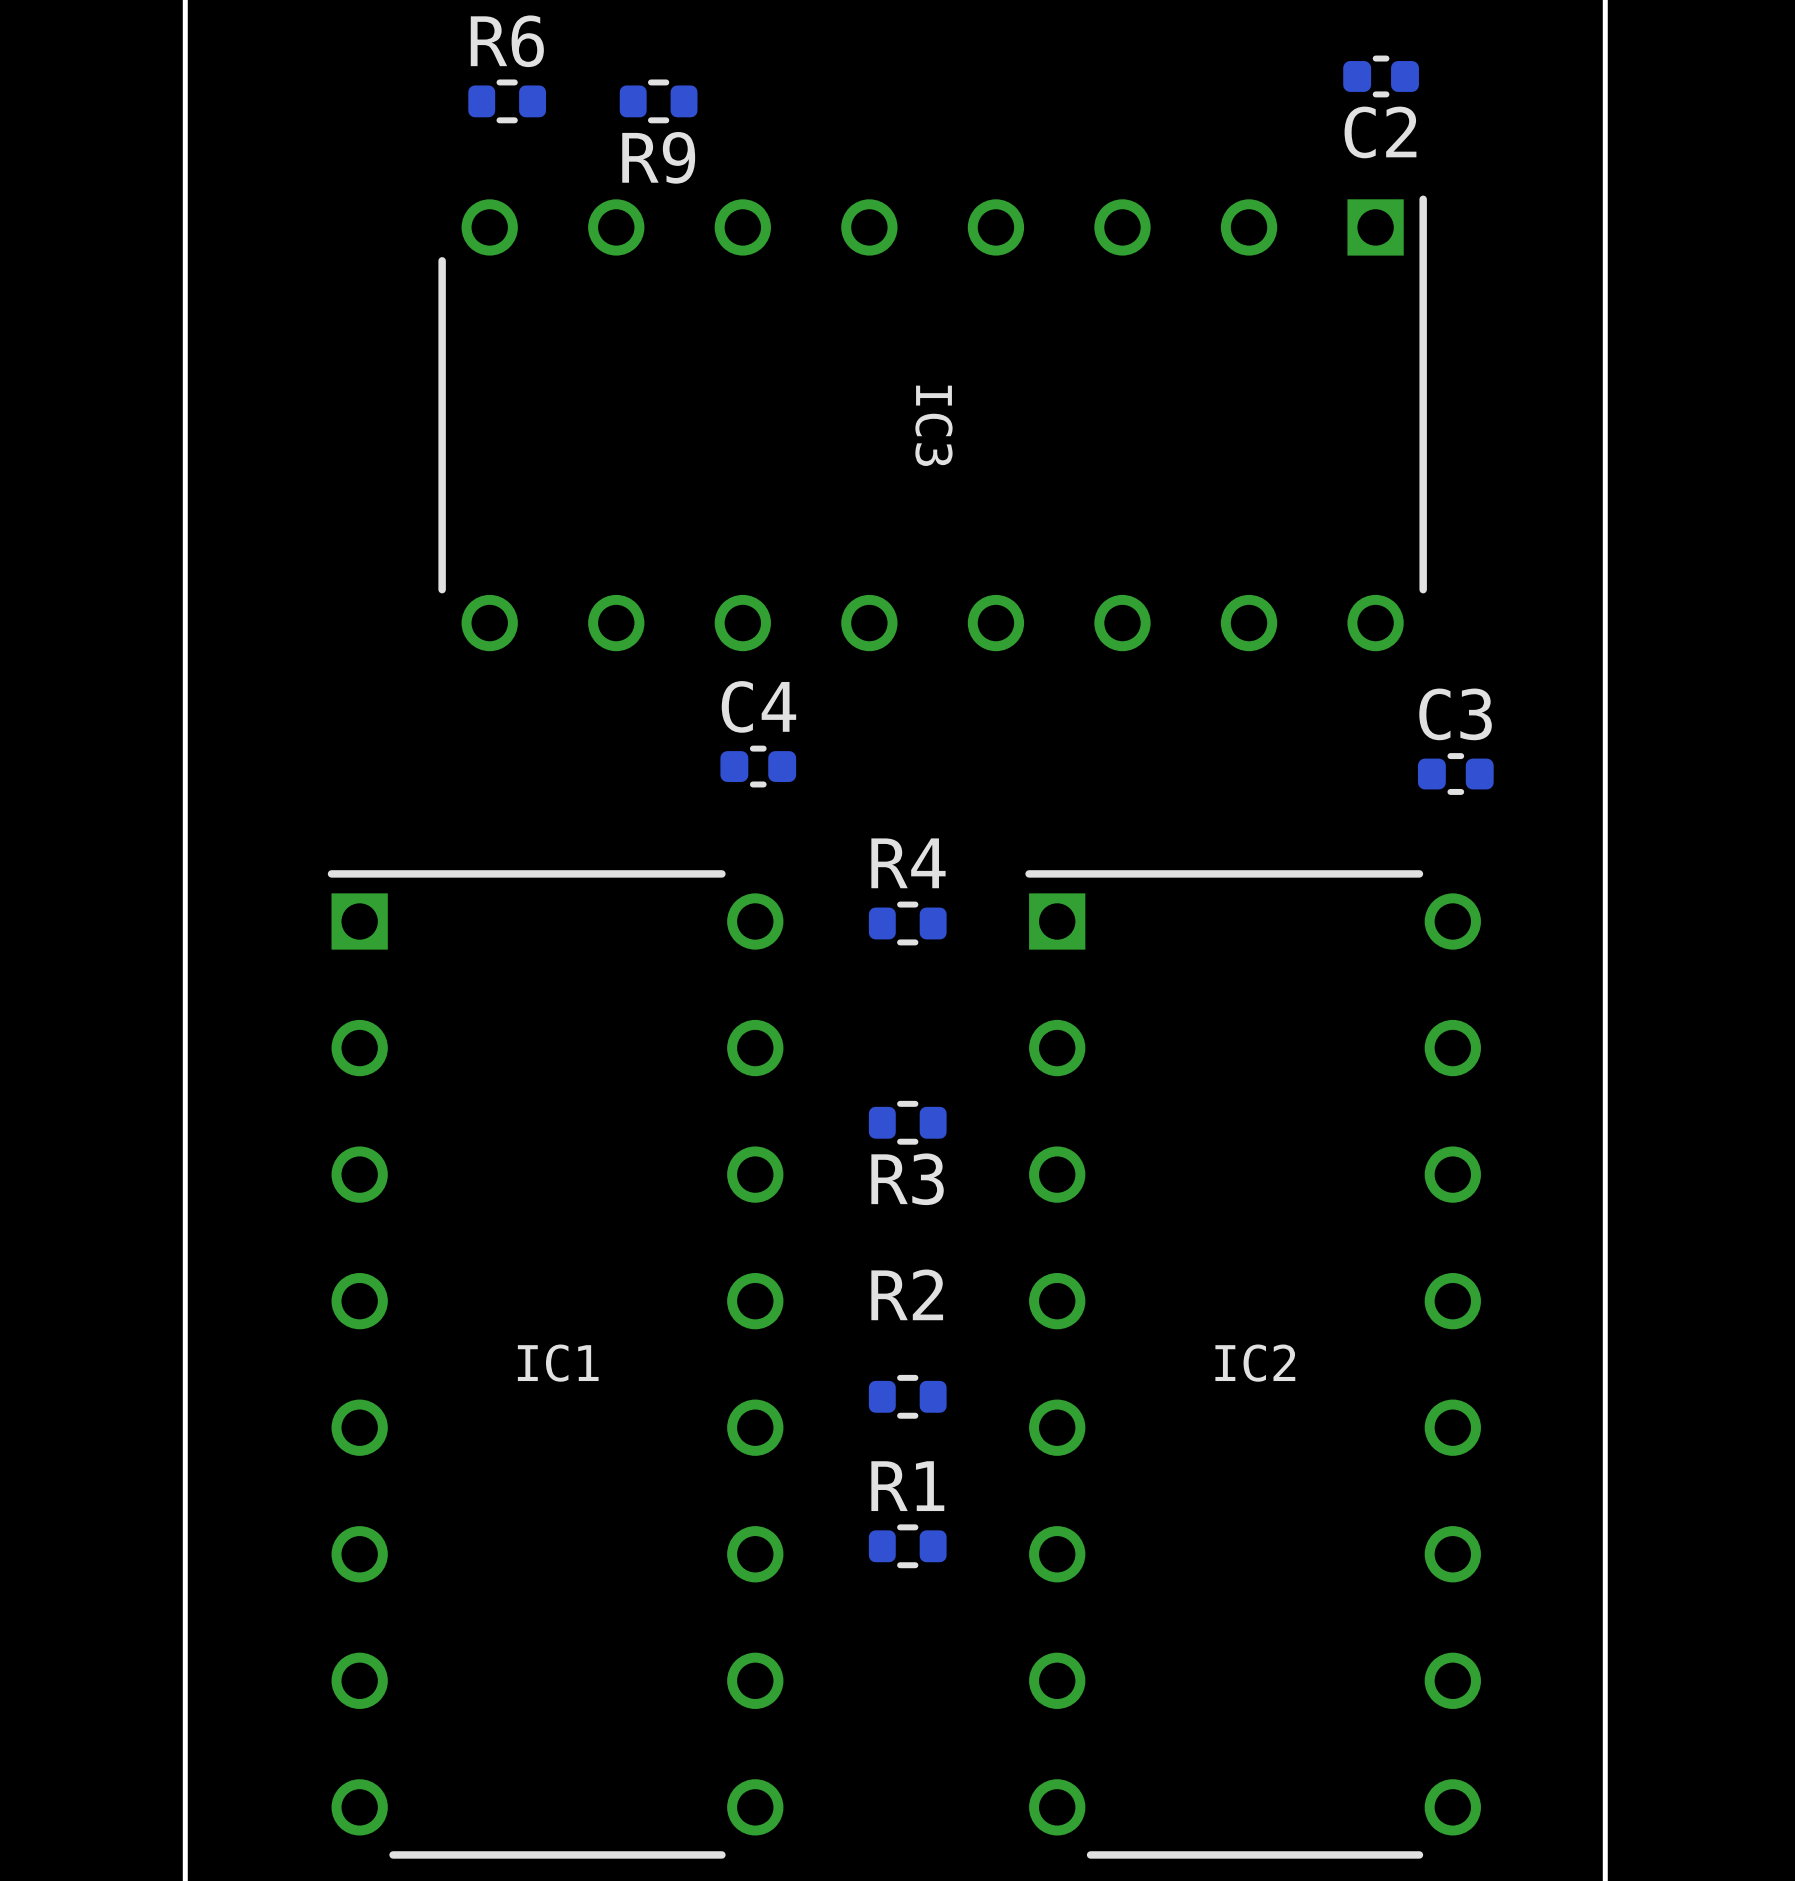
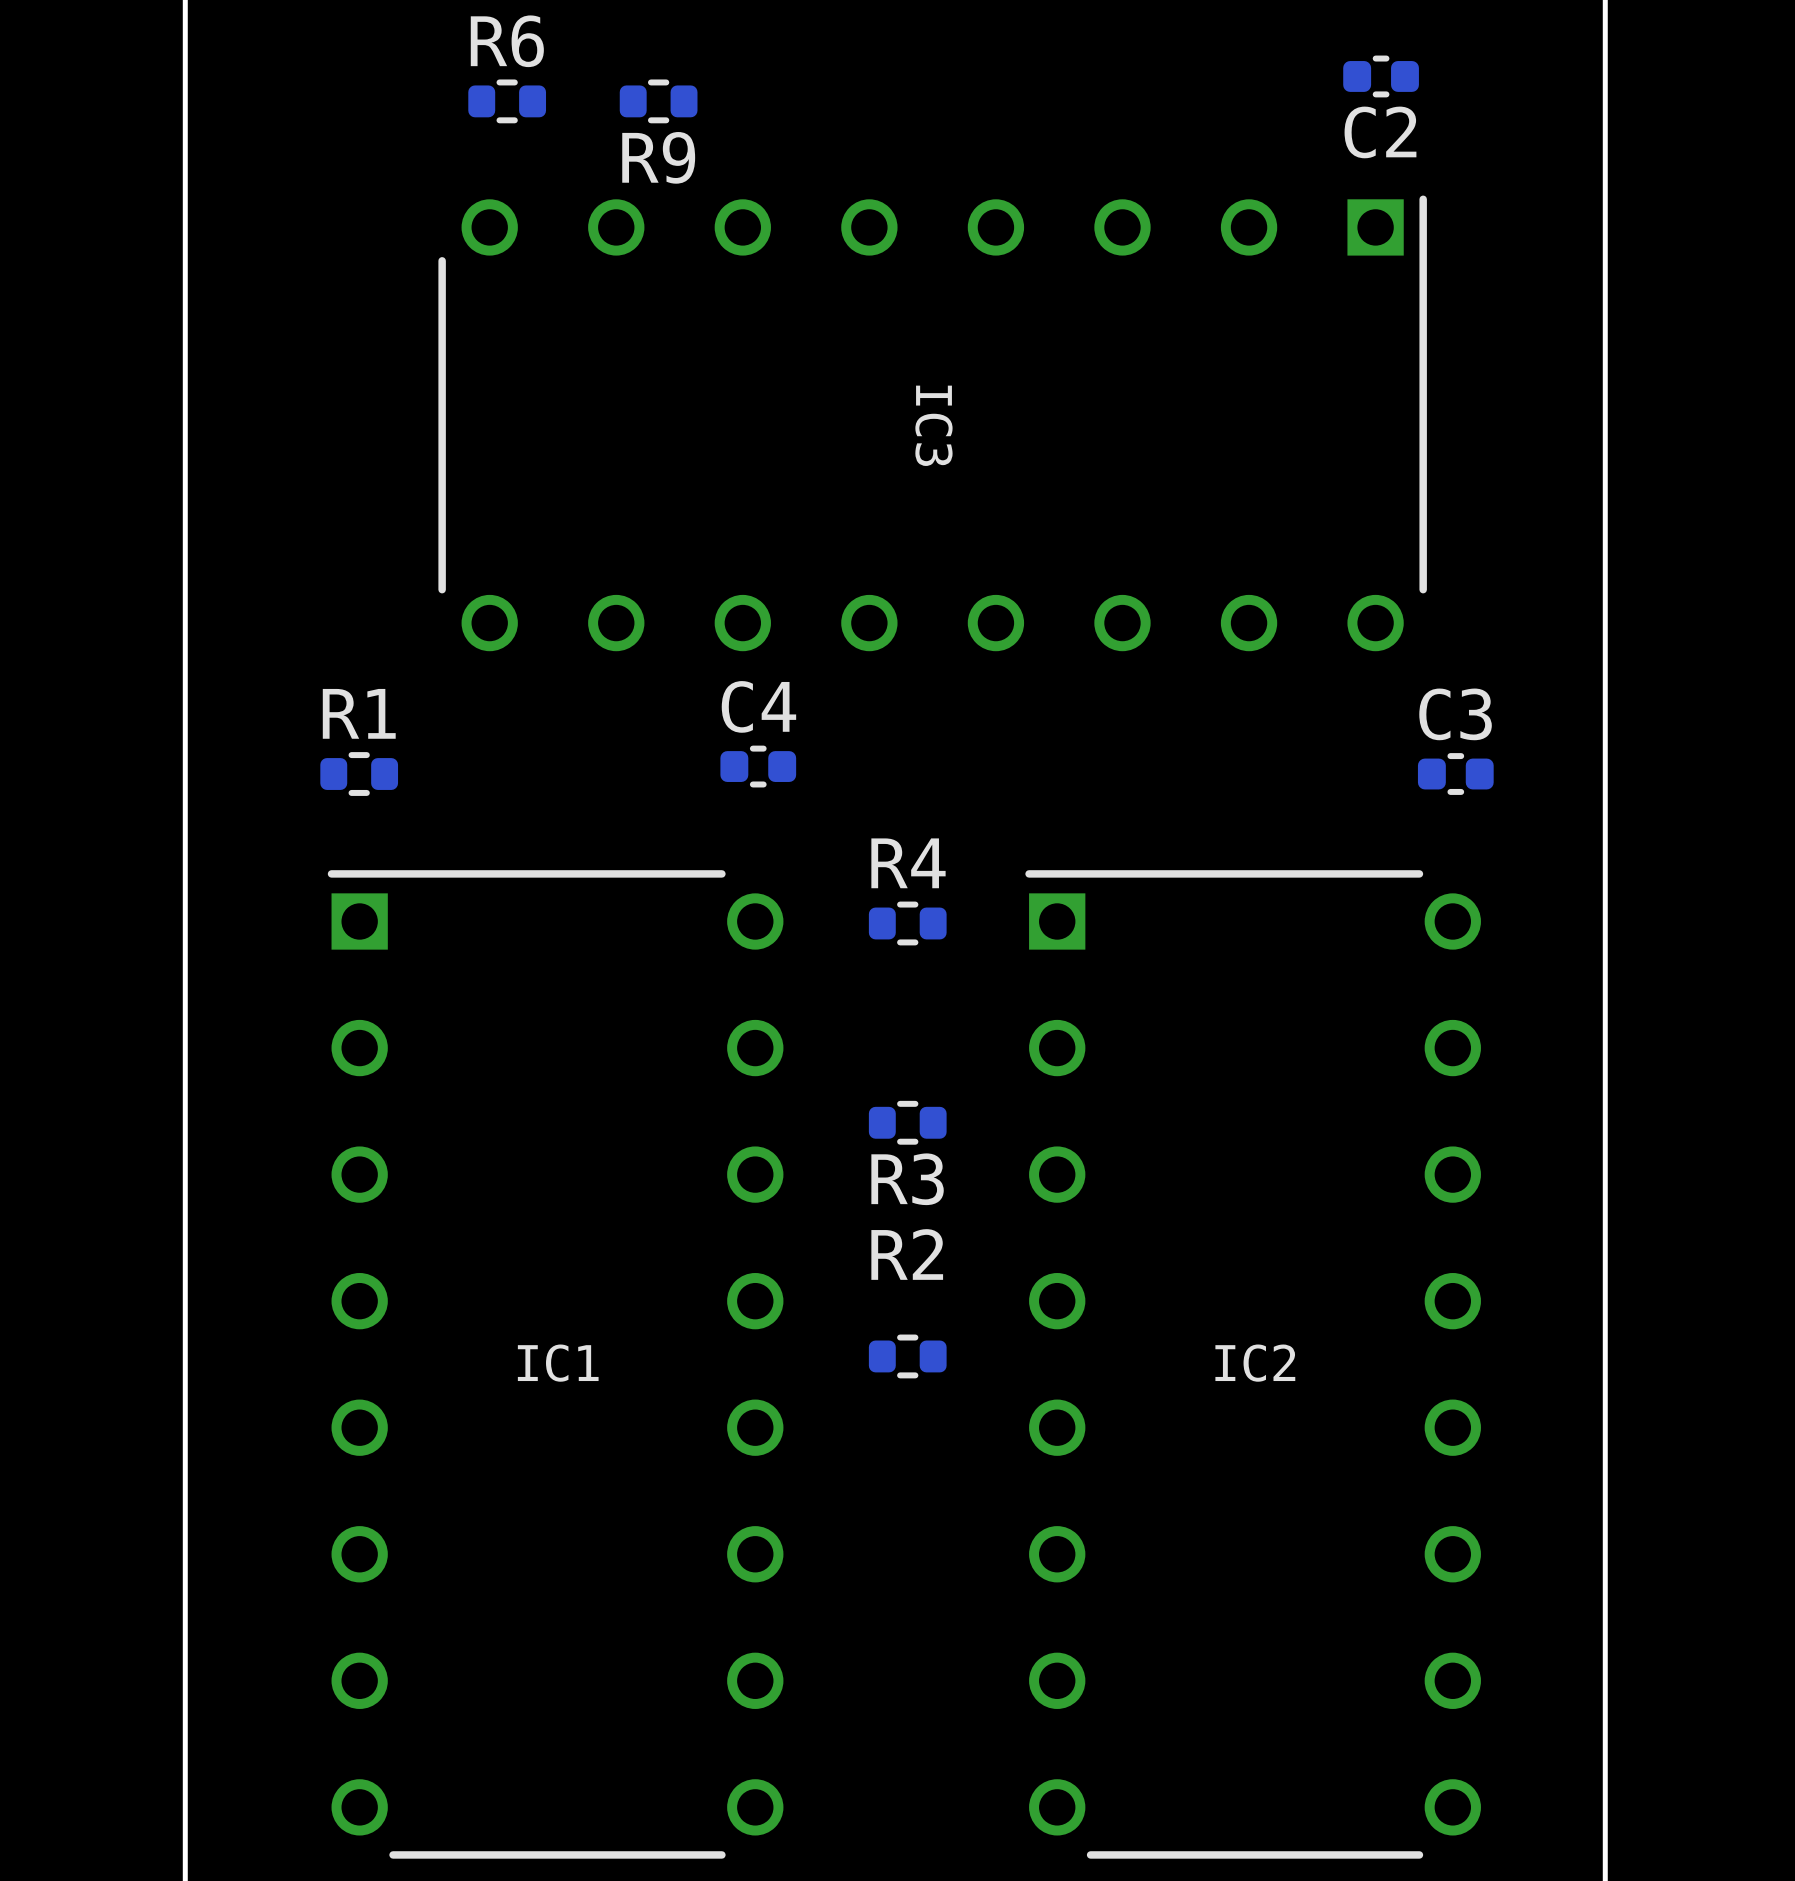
R2 position: (907, 1396) -> (907, 1356)
R1 position: (907, 1546) -> (359, 774)

